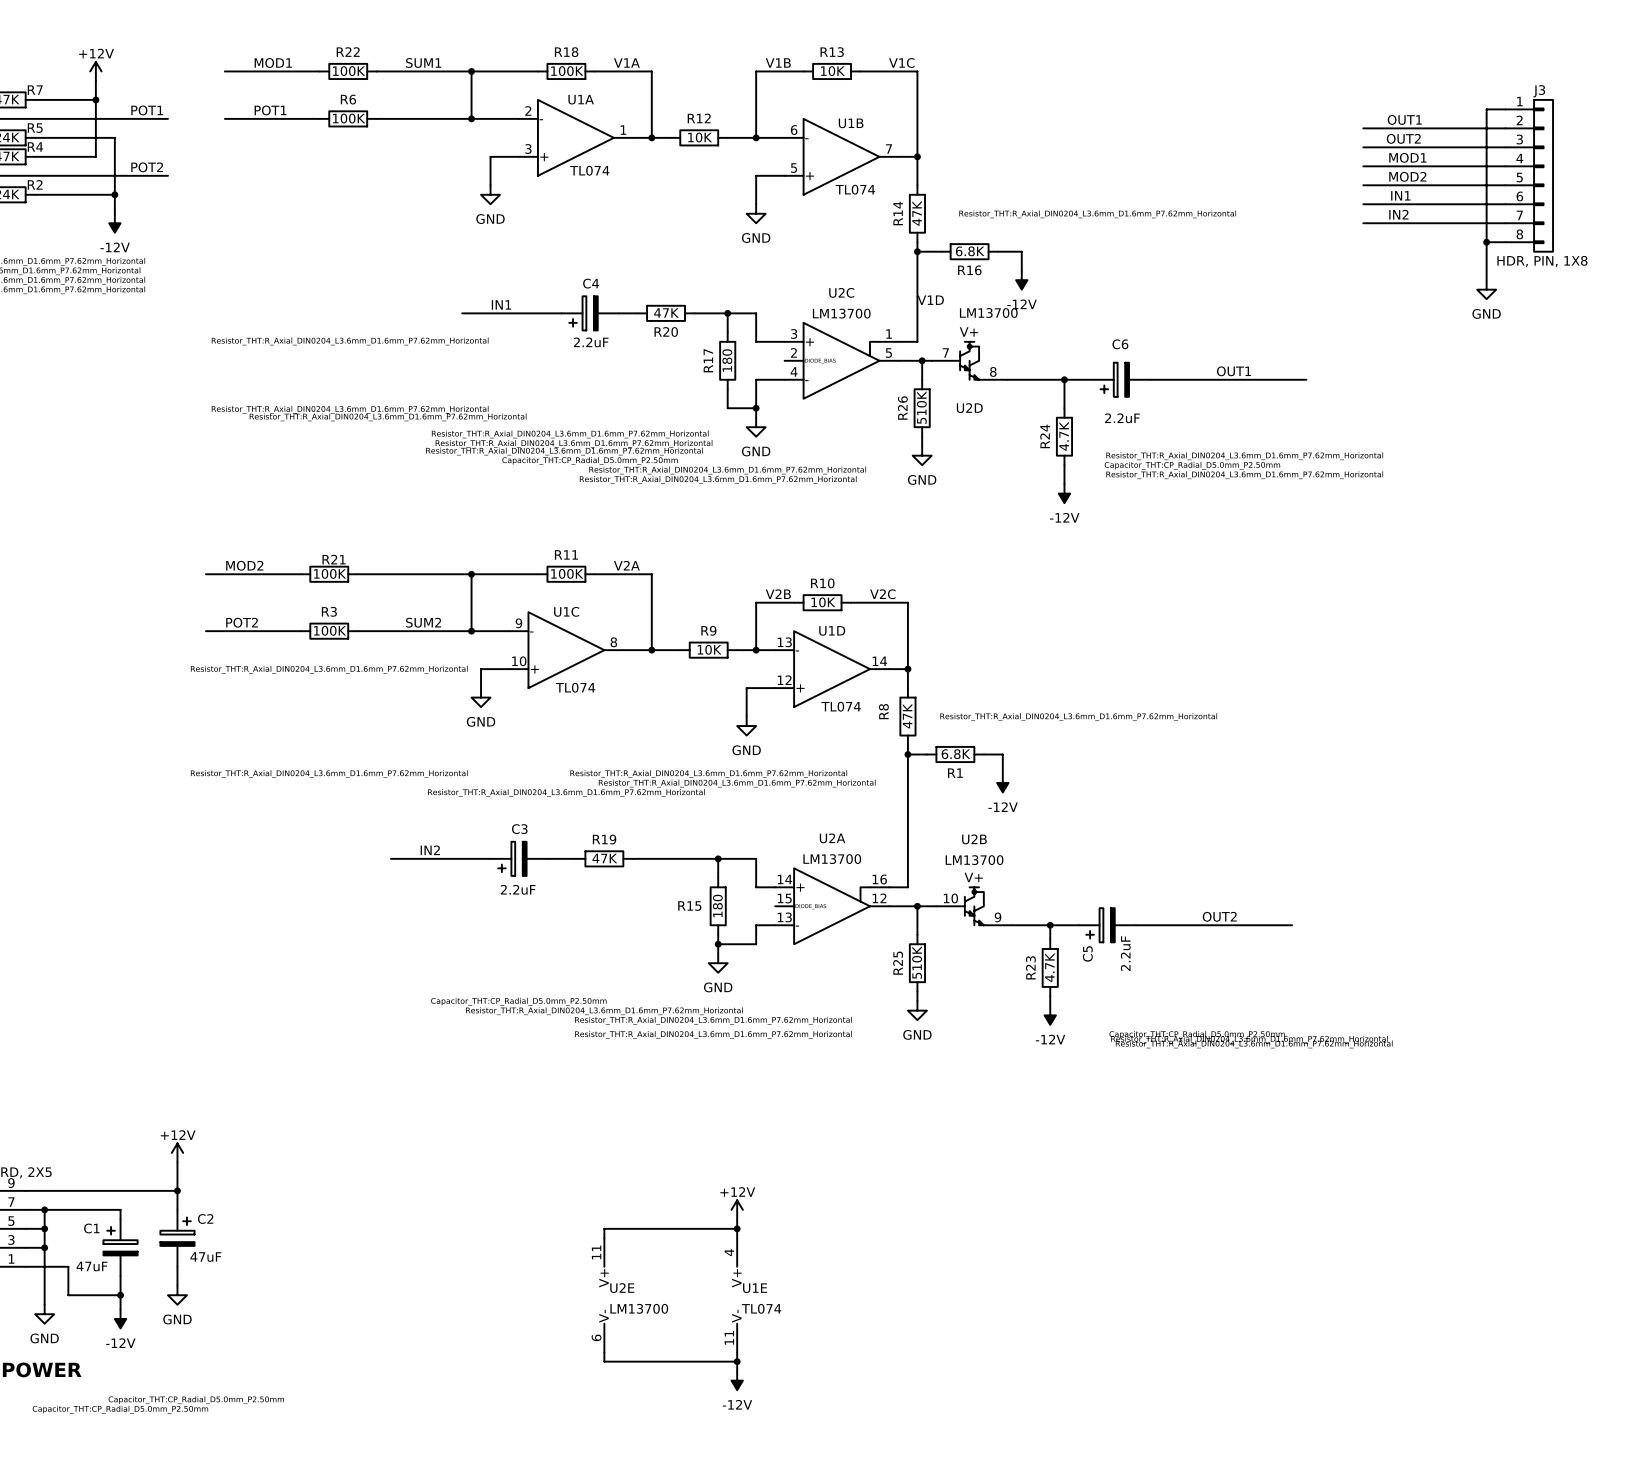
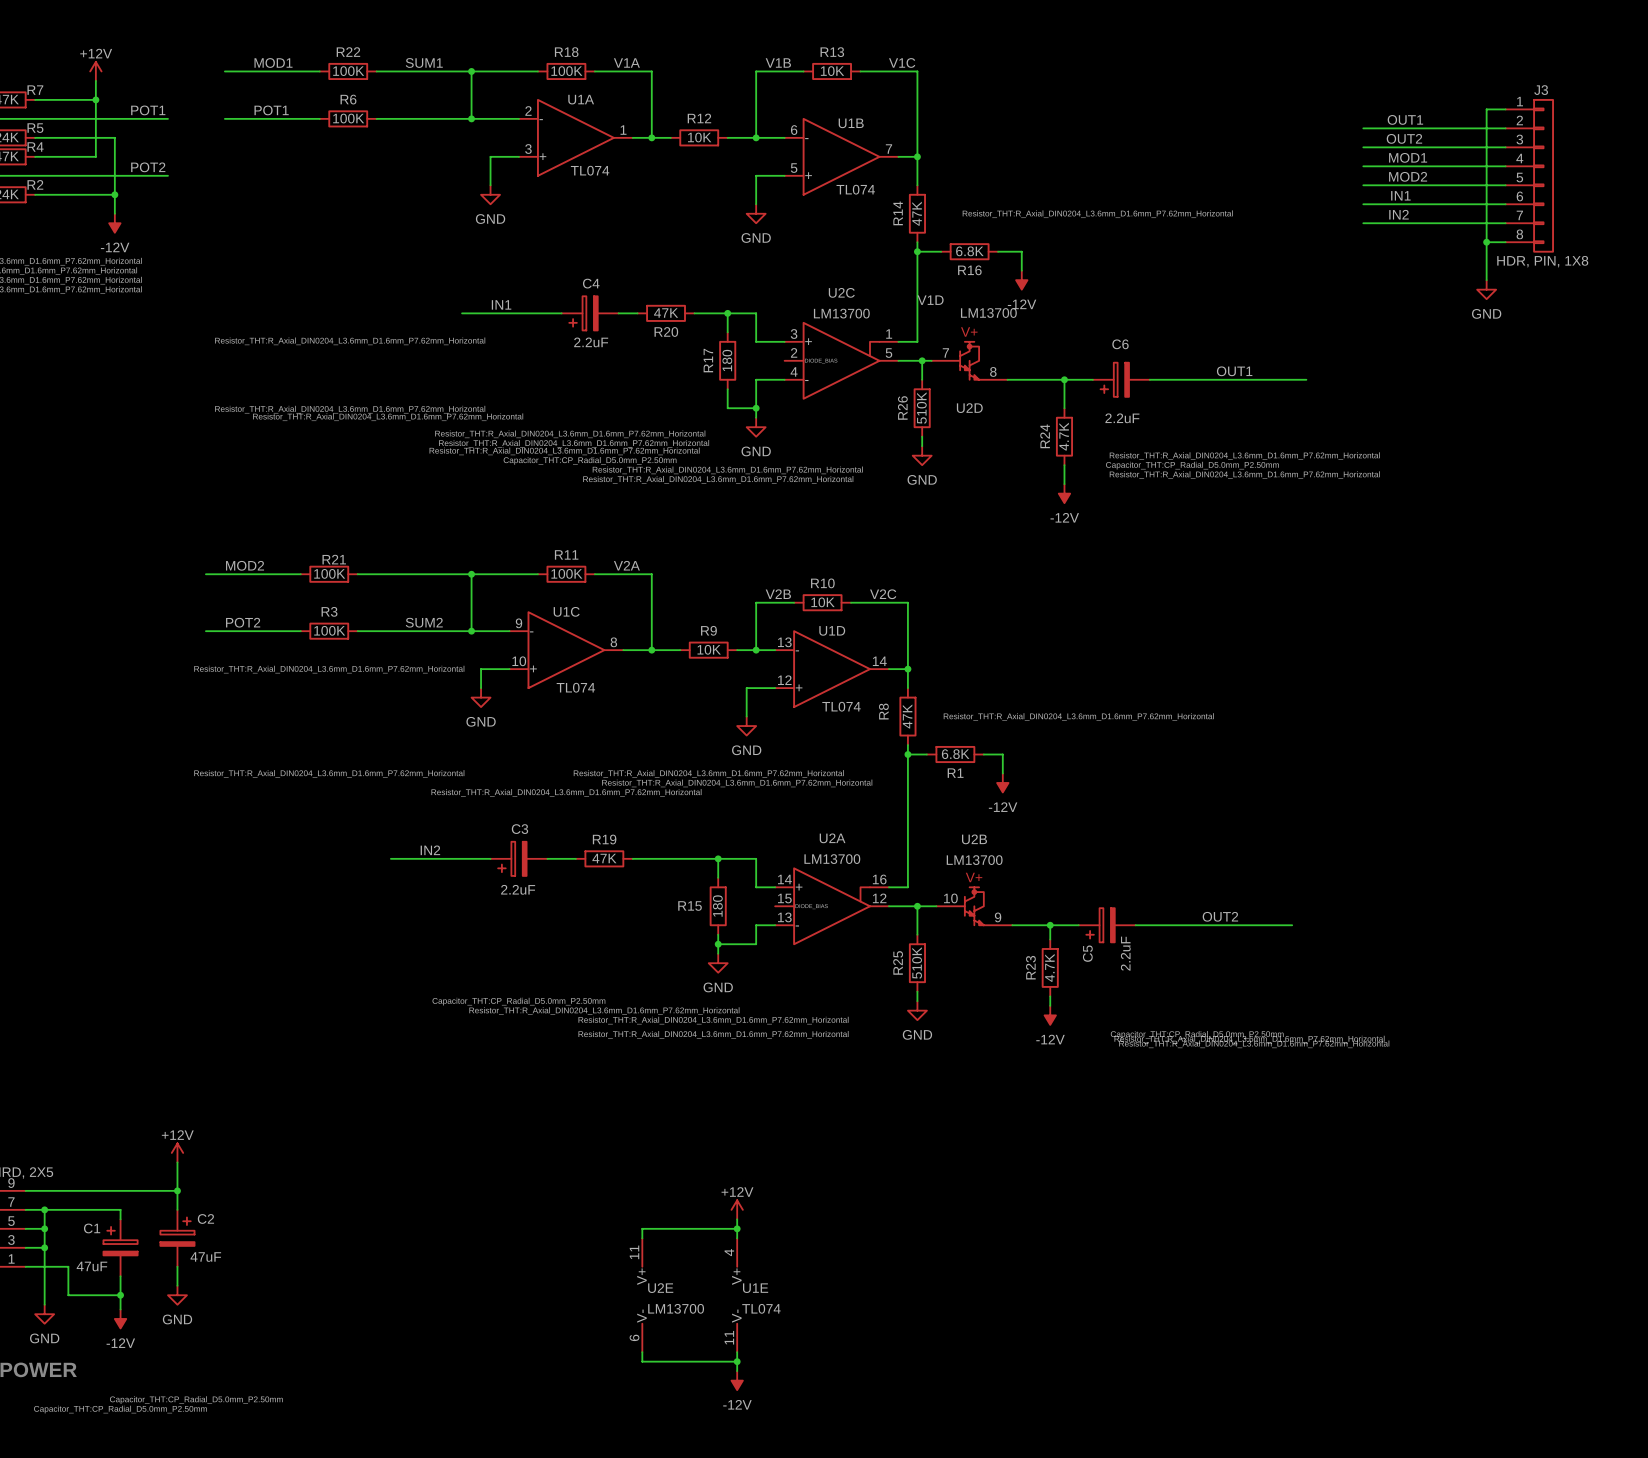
wire: (642, 1228) (604, 1228) (604, 1238) -> (642, 1228) (642, 1238)
U2E position: (604, 1295) -> (642, 1295)
wire: (604, 1352) (604, 1361) (642, 1361) -> (642, 1352) (642, 1361)

